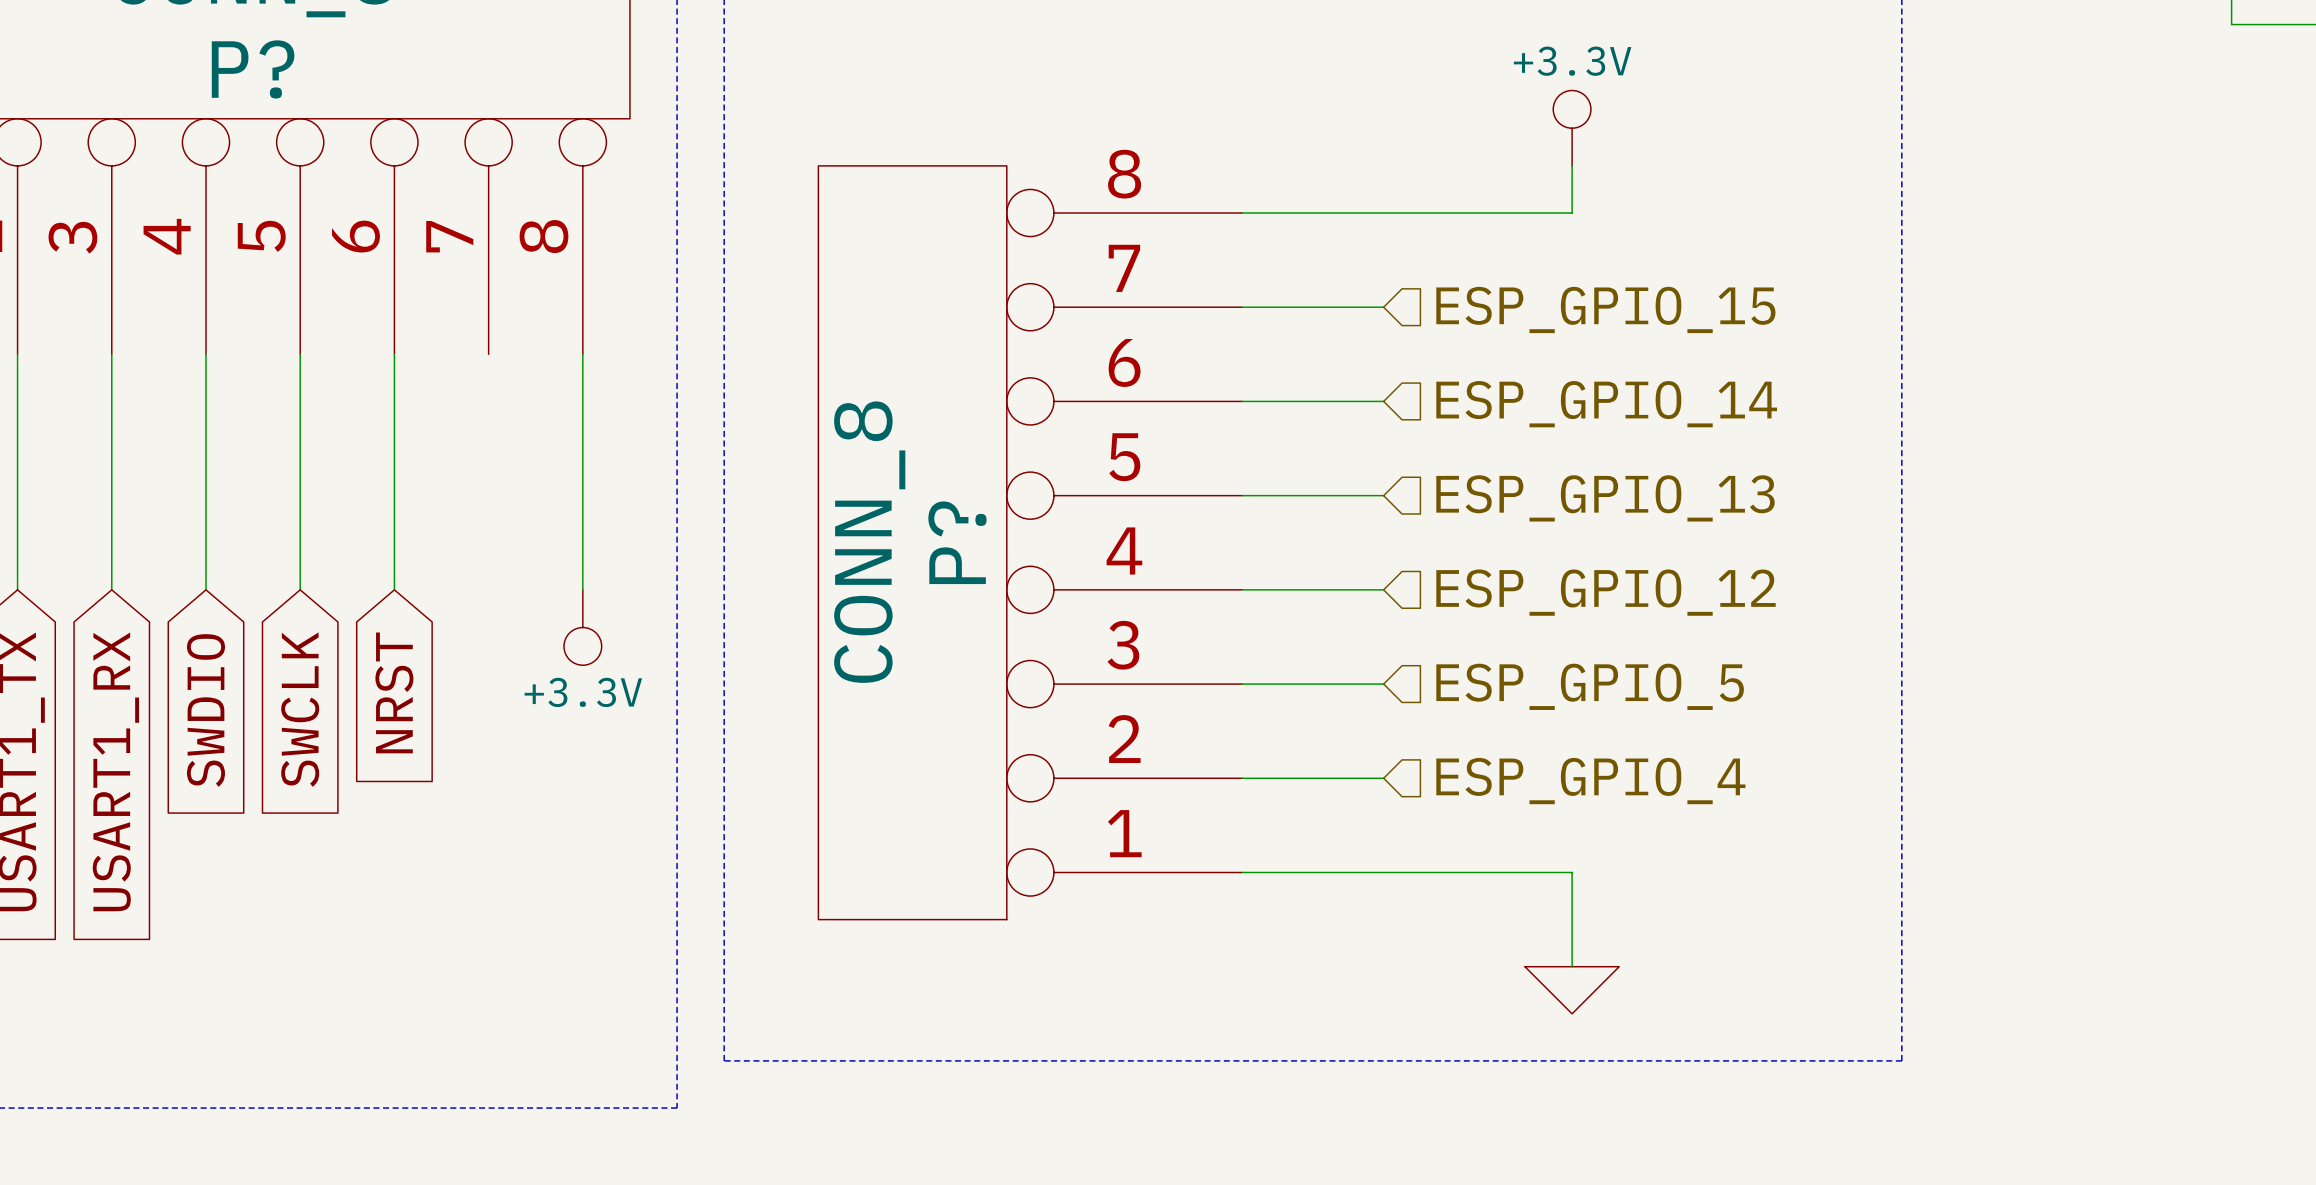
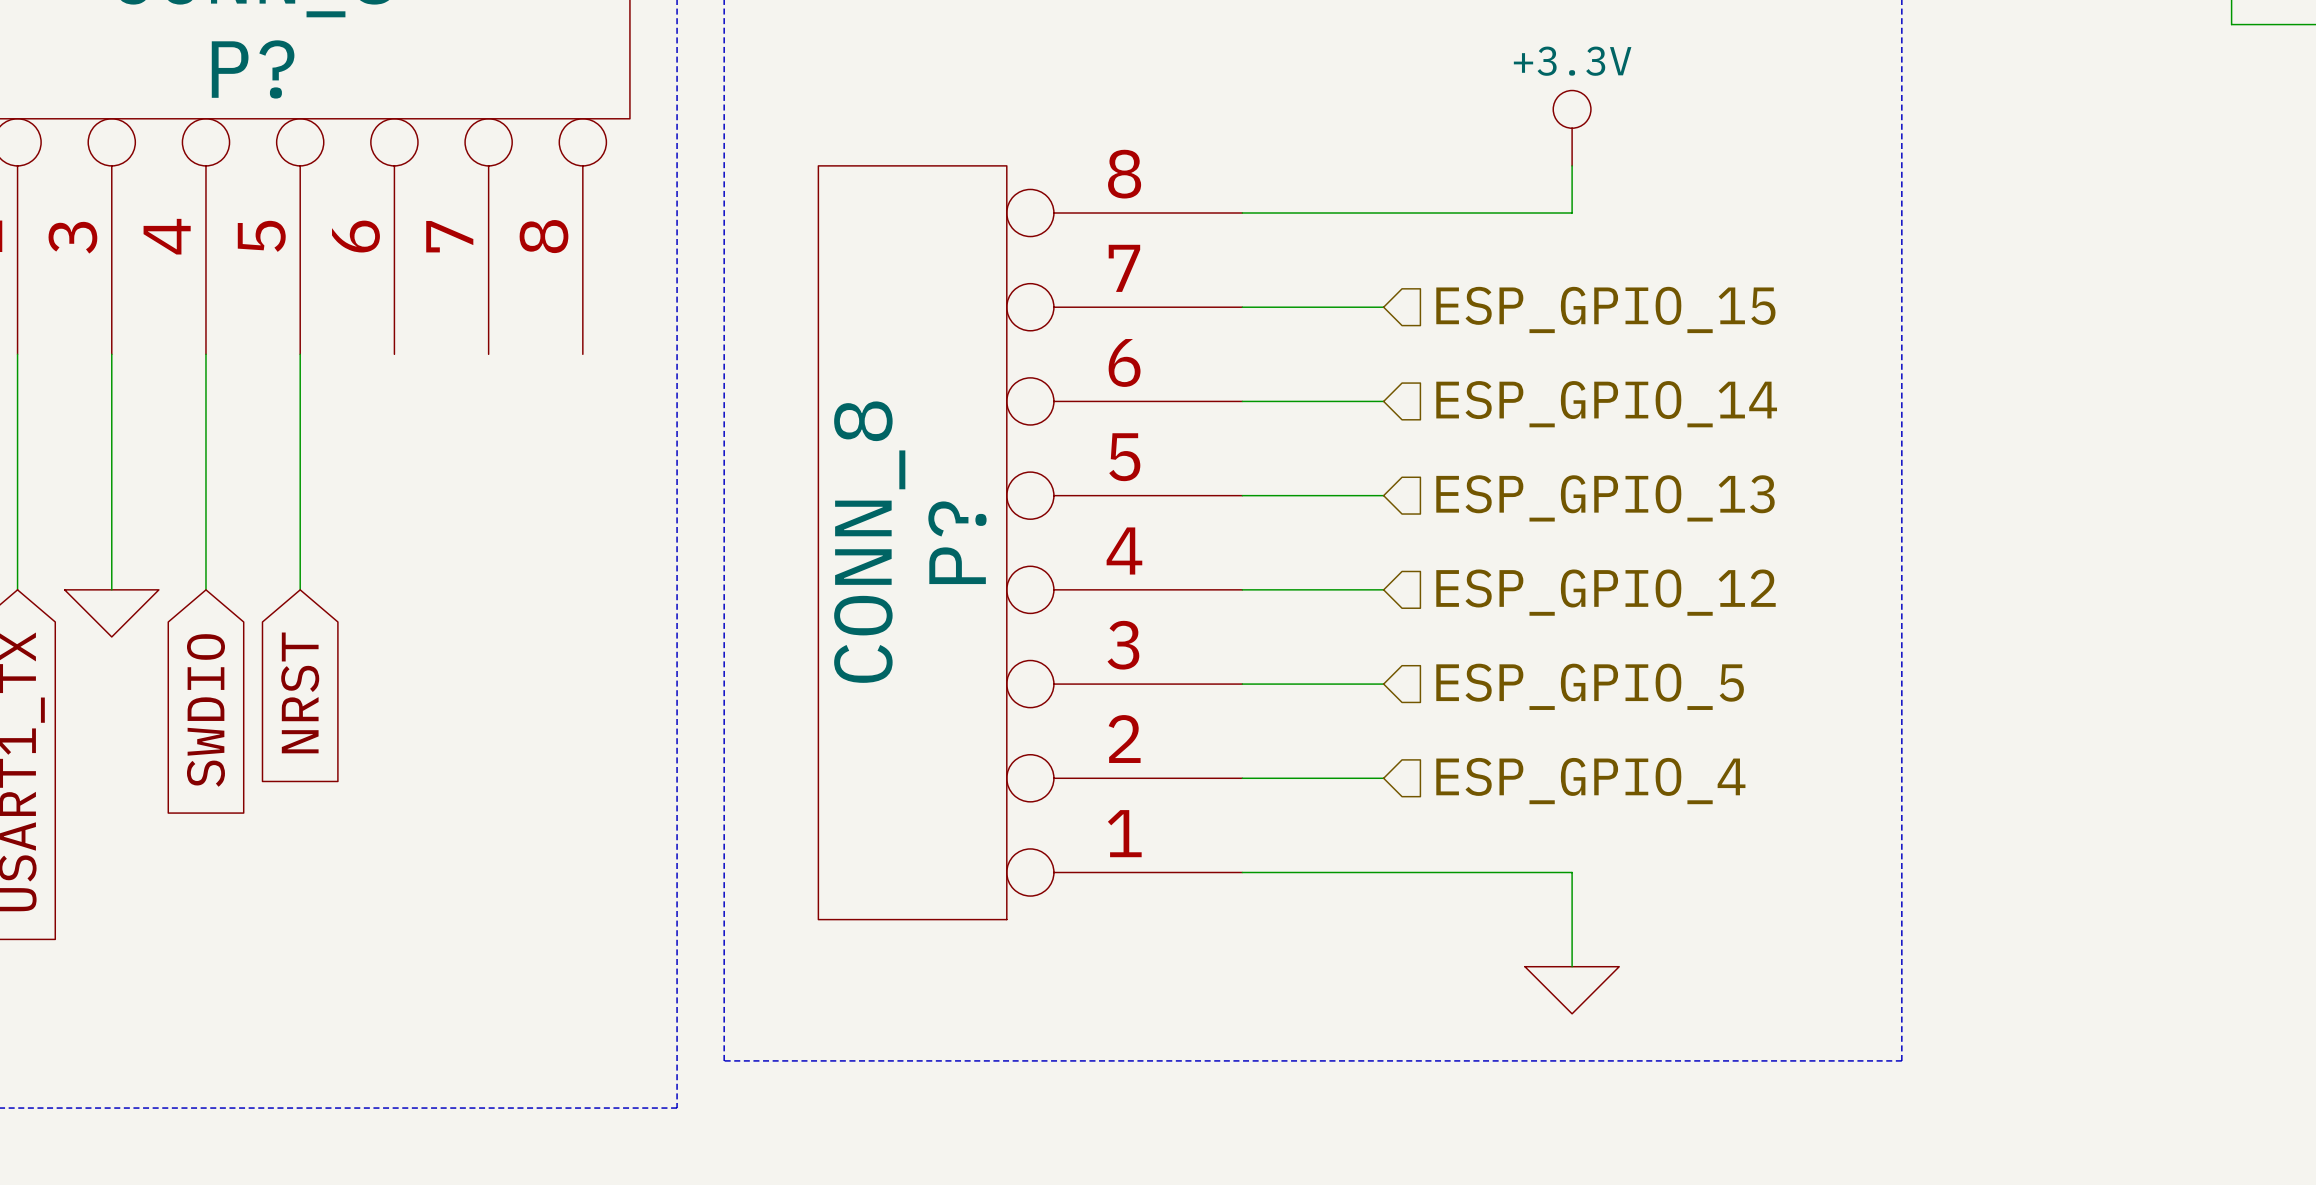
wire: (394, 354) (394, 589) -> none
wire: (582, 354) (582, 589) -> none
power symbol: none -> (111, 613)
power symbol: +3.3V (582, 627) -> none
global label: NRST (394, 692) -> none
global label: SWCLK (300, 709) -> NRST (300, 692)
global label: USART1_RX (115, 771) -> none

